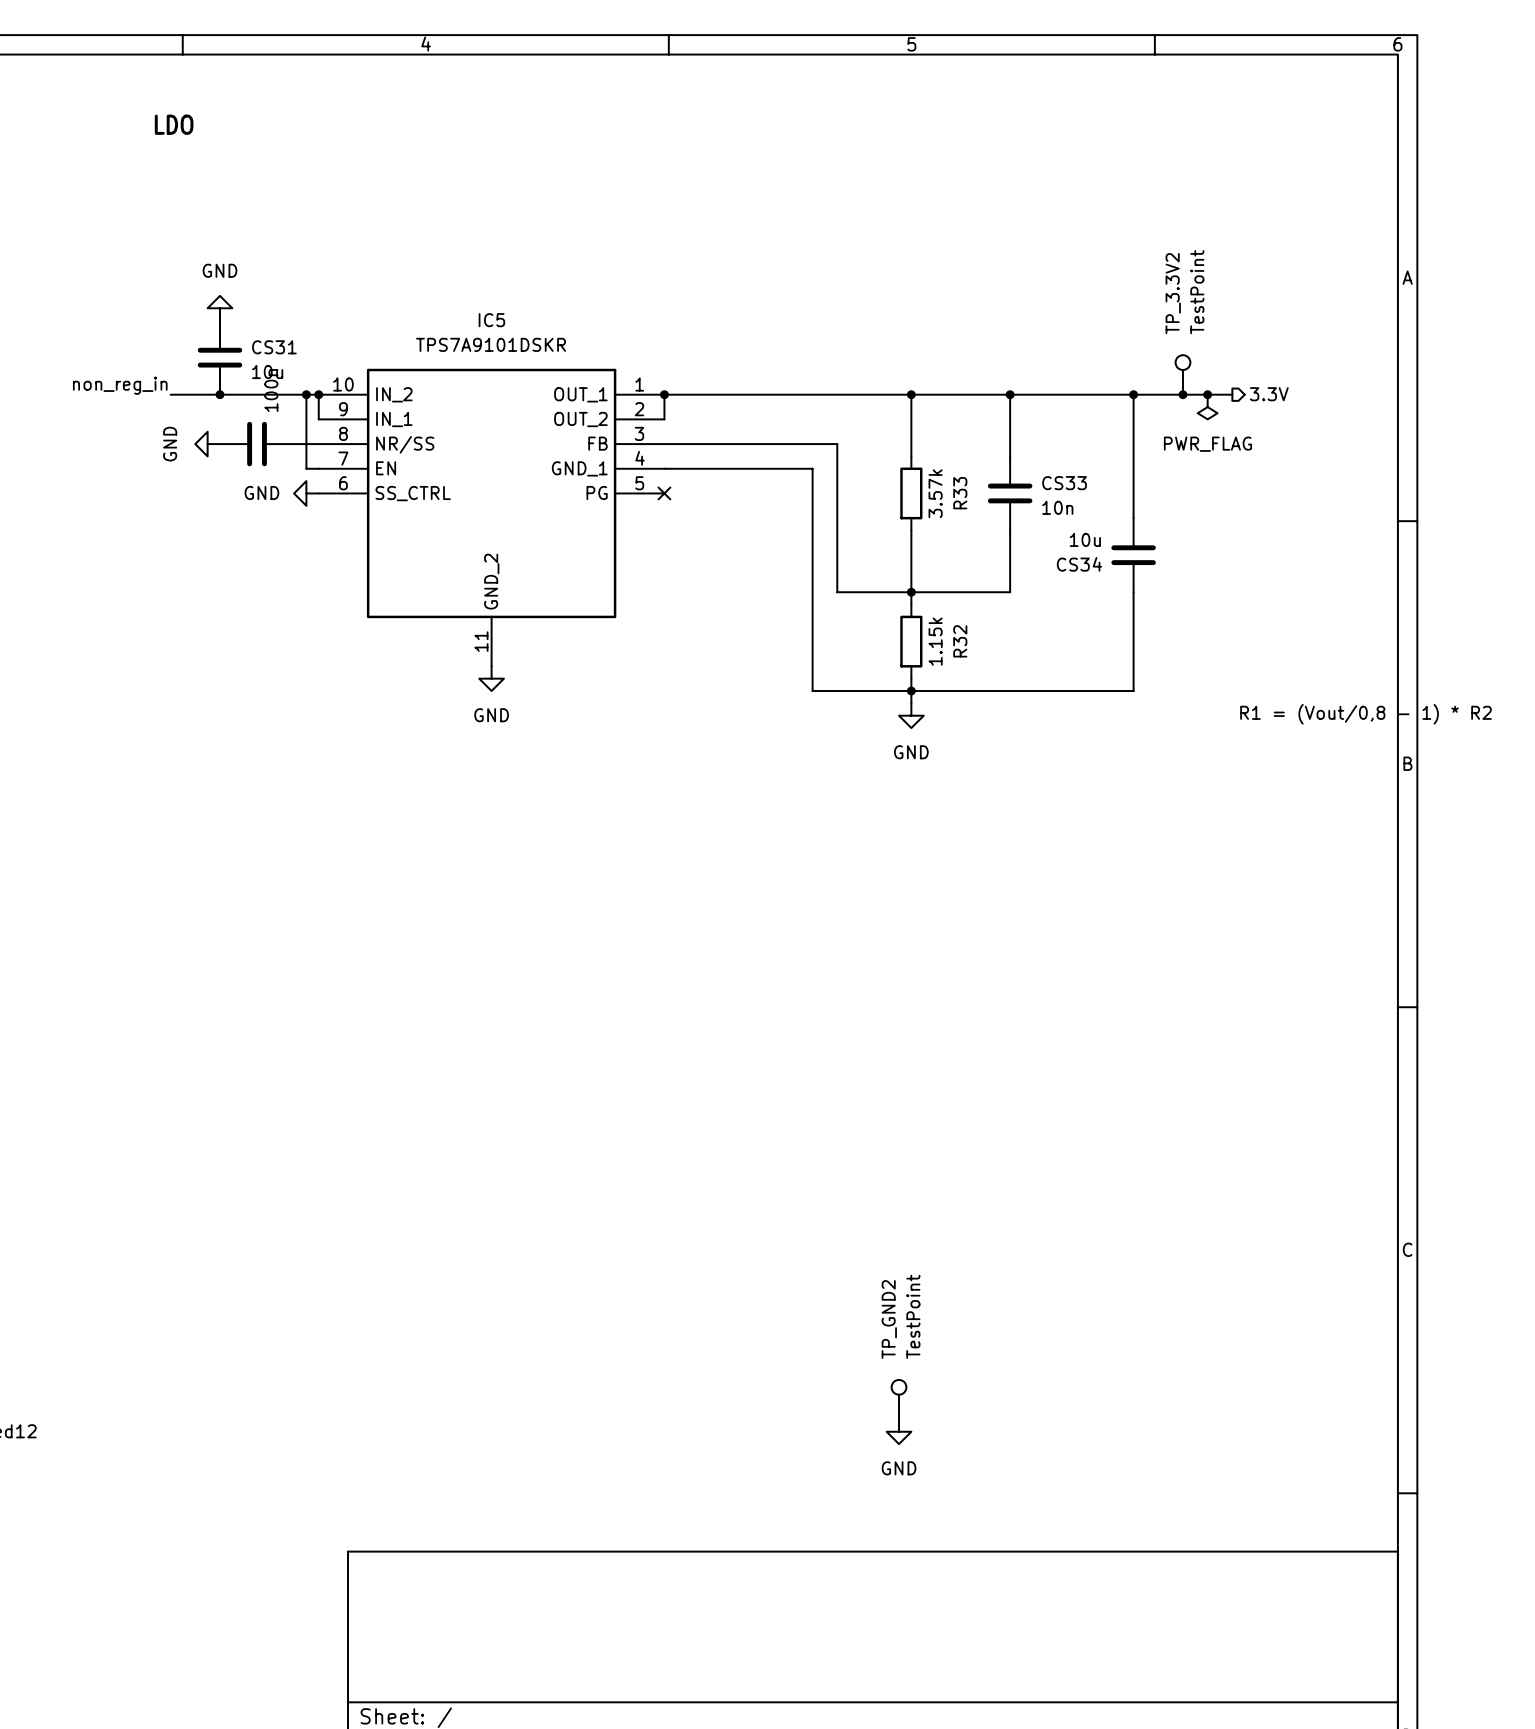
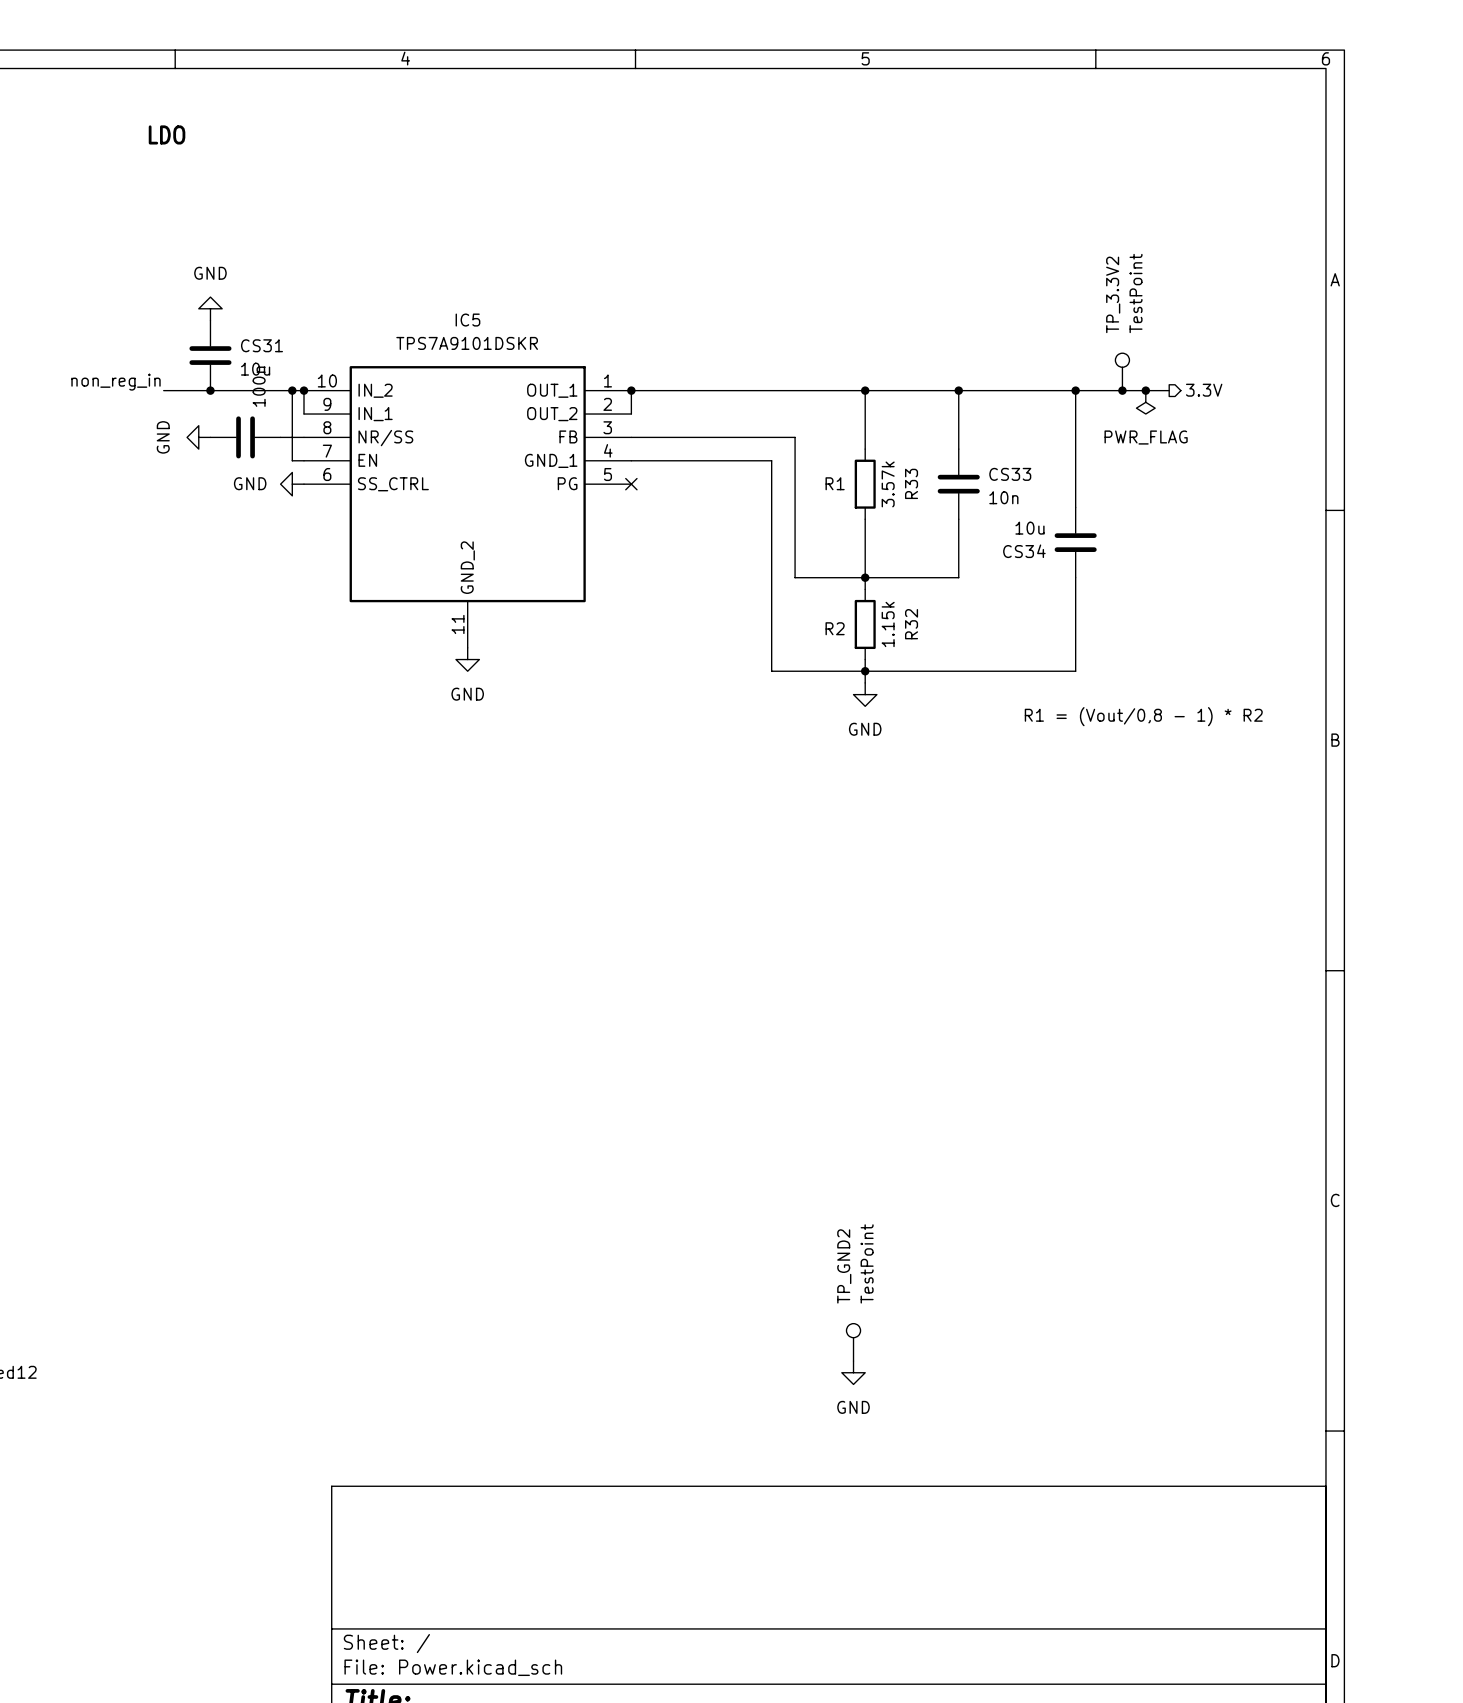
text: none -> R1 (835, 483)
text: none -> R2 (835, 628)
text position: R1 = (Vout/0,8 - 1) * R2 (1365, 714) -> R1 = (Vout/0,8 - 1) * R2 (1143, 716)

